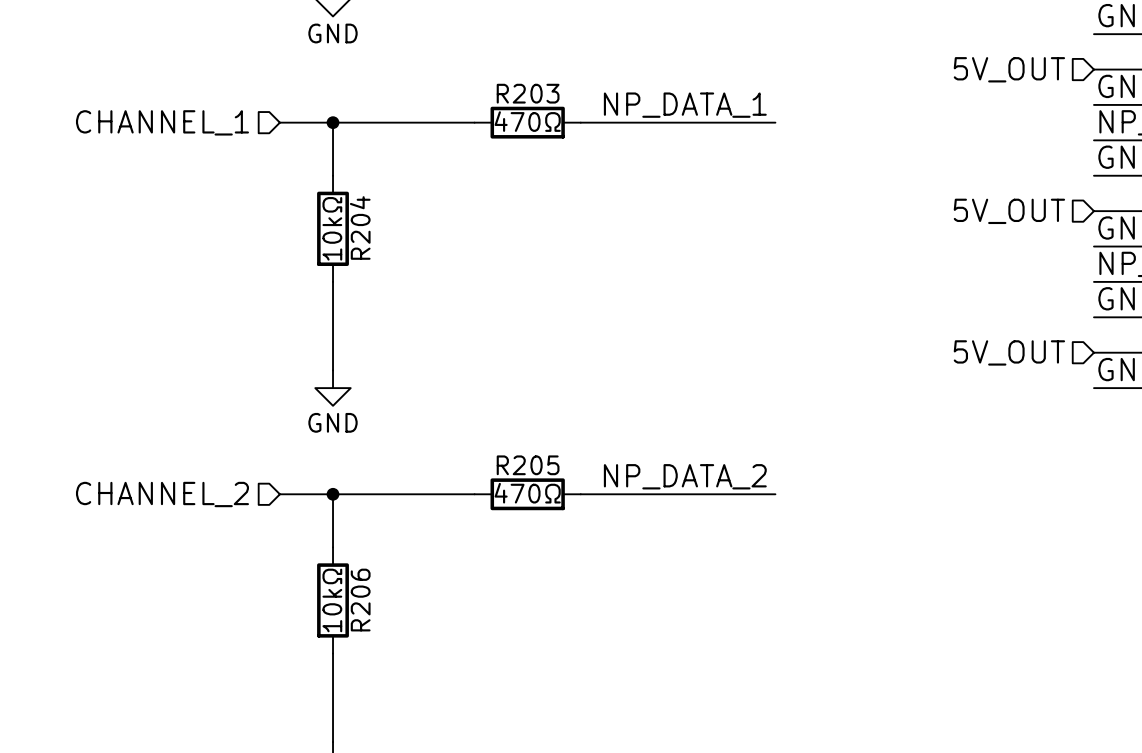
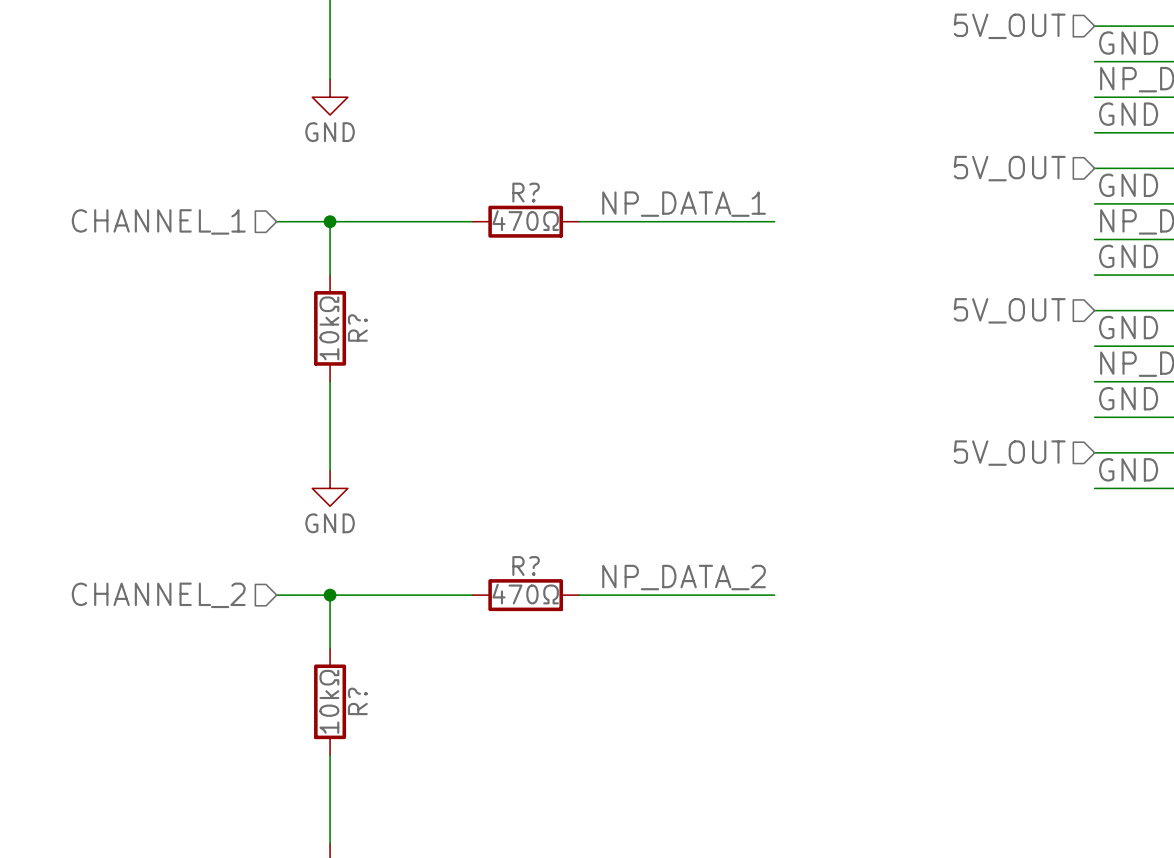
R203 name: R203 (528, 93) -> R? (526, 192)
R204 name: R204 (360, 227) -> R? (357, 327)
R205 name: R205 (528, 465) -> R? (526, 566)
R206 name: R206 (360, 600) -> R? (357, 701)

